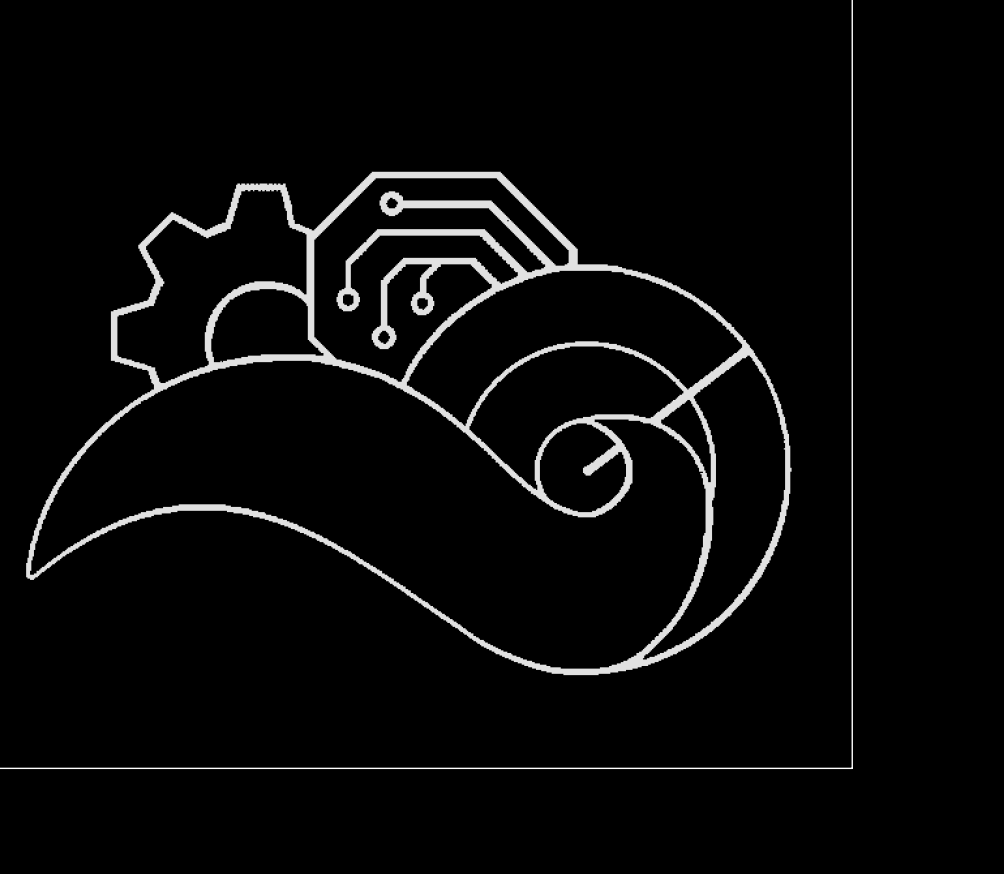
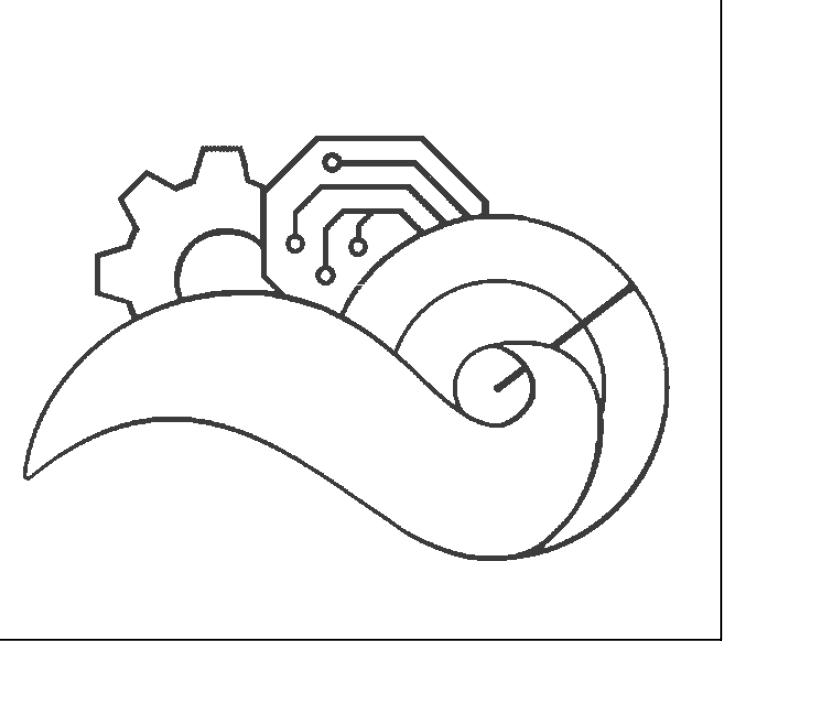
drawing: [419, 347, 430, 350] -> none

